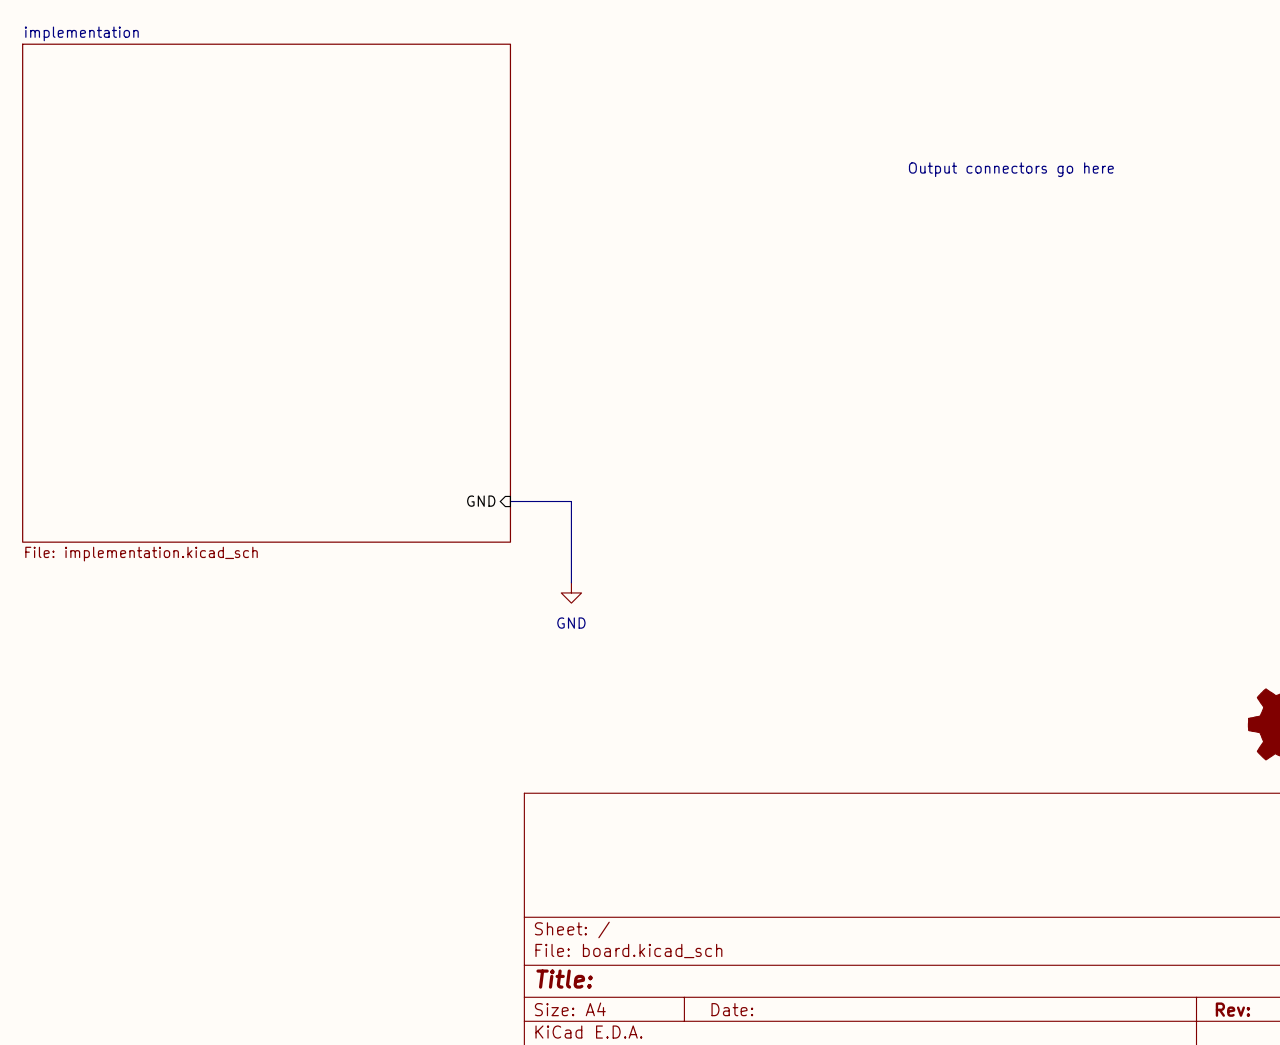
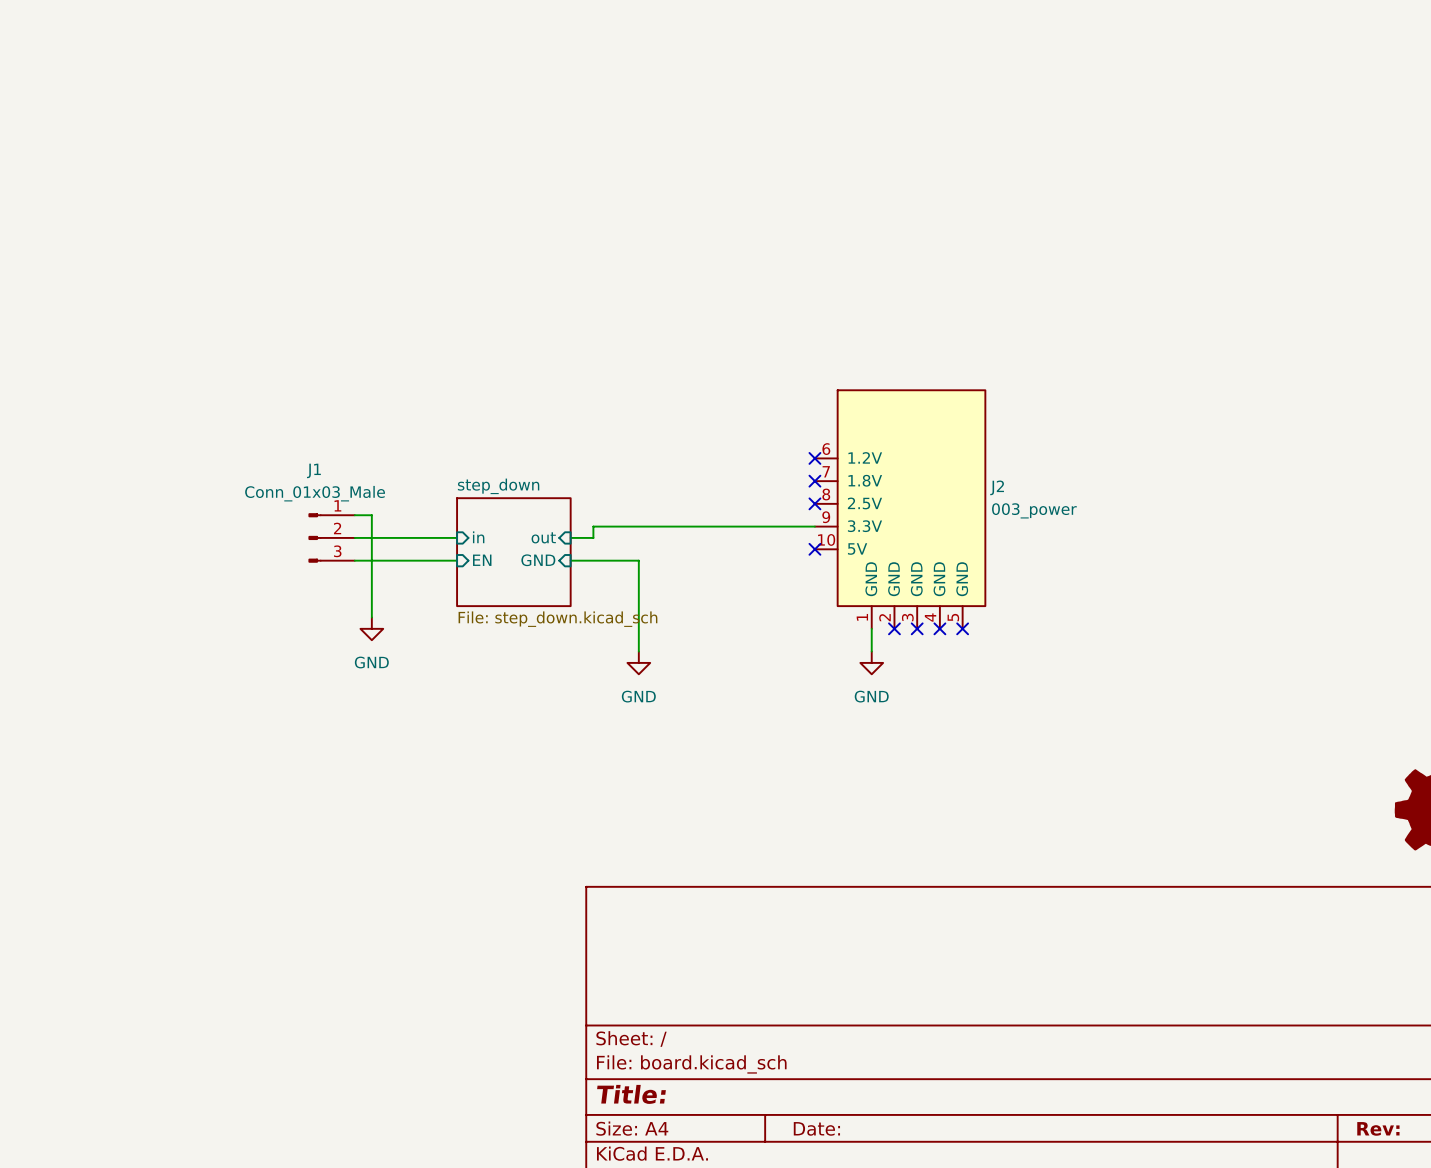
text: Output connectors go here (1011, 169) -> none
sheet implementation: File: implementation.kicad_sch (266, 293) -> none
no-connect mark: none -> (814, 458)
no-connect mark: none -> (814, 481)
no-connect mark: none -> (814, 503)
J2: none -> 003_power (900, 509)
wire: none -> (354, 515) (371, 515) (371, 617)
wire: none -> (814, 526) (593, 526) (593, 537) (570, 537)
sheet pin: none -> in (478, 537)
sheet pin: none -> out (543, 537)
J1: none -> Conn_01x03_Male (331, 537)
wire: none -> (354, 537) (457, 537)
no-connect mark: none -> (814, 549)
sheet step_down: none -> File: step_down.kicad_sch (513, 552)
wire: none -> (354, 560) (457, 560)
sheet pin: none -> EN (482, 560)
power symbol: none -> GND (371, 628)
wire: none -> (871, 628) (871, 651)
no-connect mark: none -> (894, 628)
no-connect mark: none -> (917, 628)
no-connect mark: none -> (939, 628)
no-connect mark: none -> (962, 628)
power symbol: none -> GND (871, 662)

